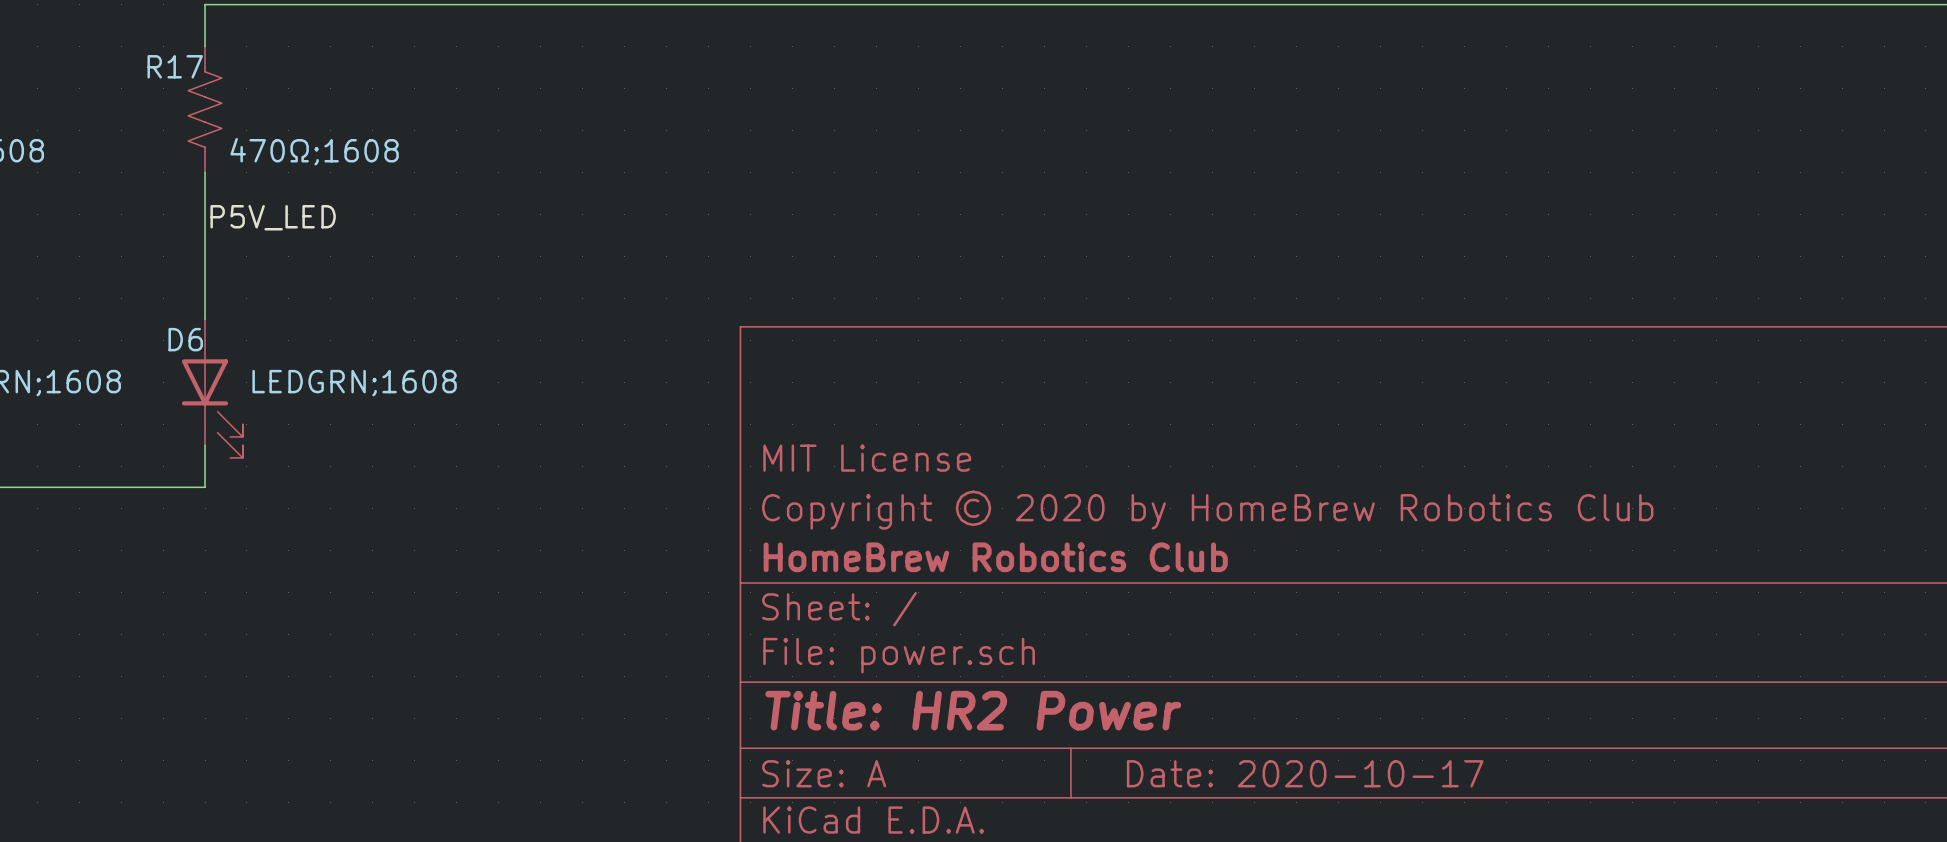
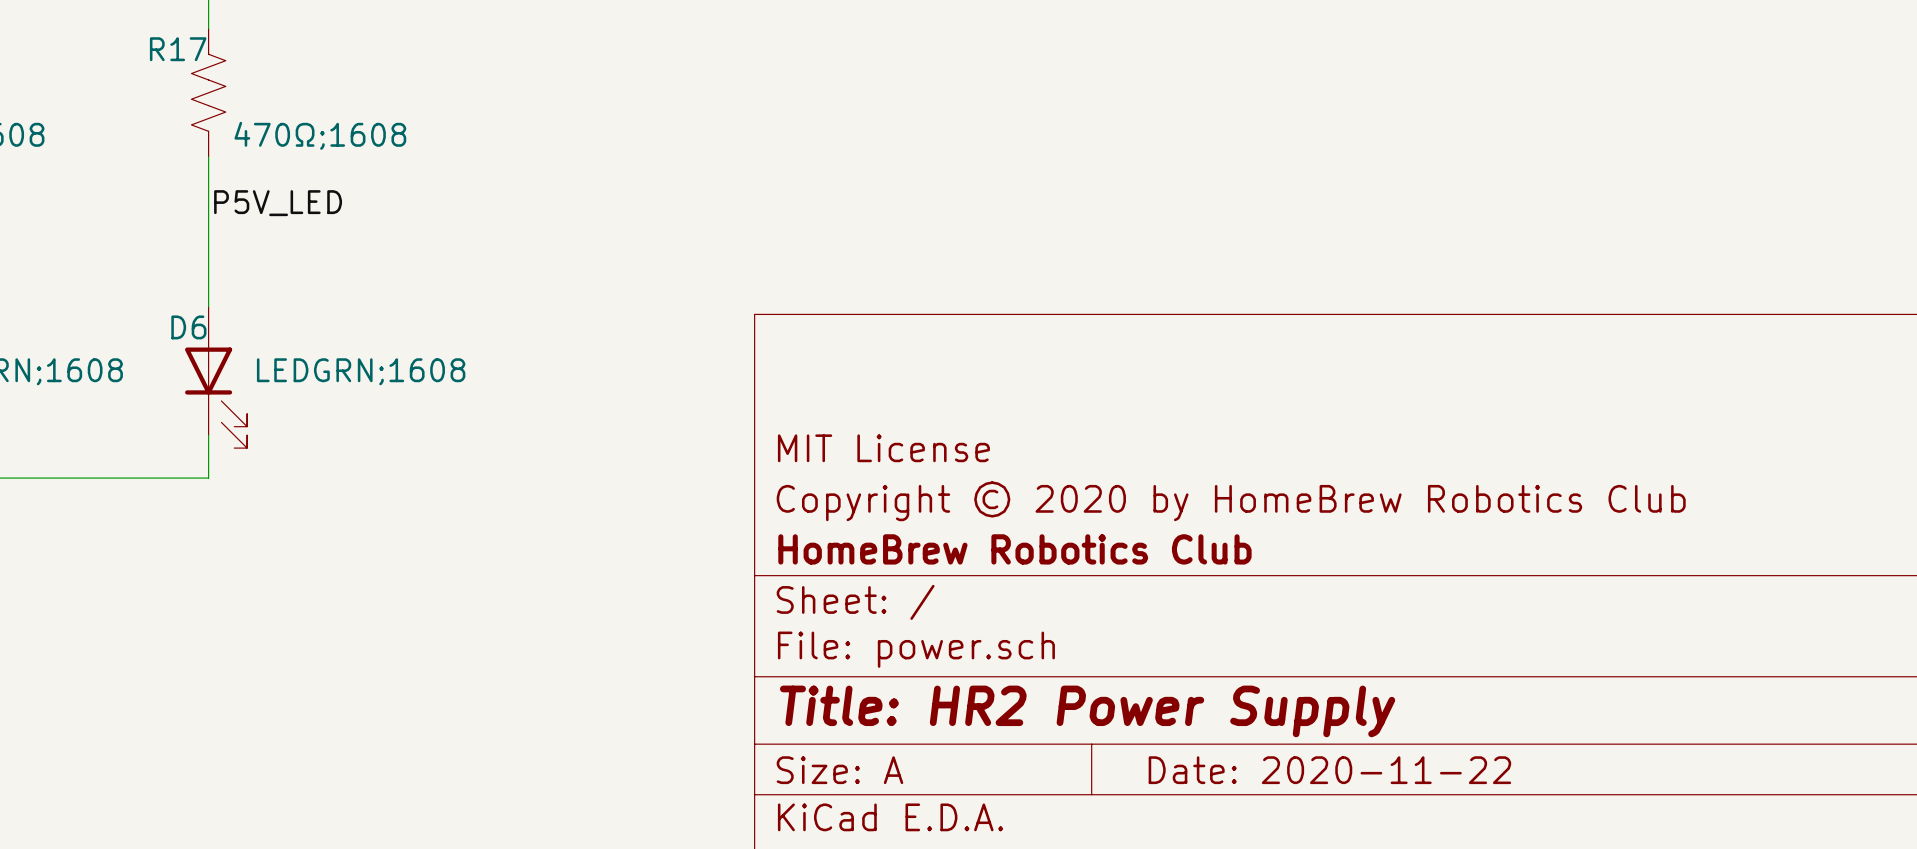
title block: Title: HR2 Power (973, 710) -> Title: HR2 Power Supply (1087, 711)
title block: Date: 2020-10-17 (1305, 773) -> Date: 2020-11-22 (1329, 770)

